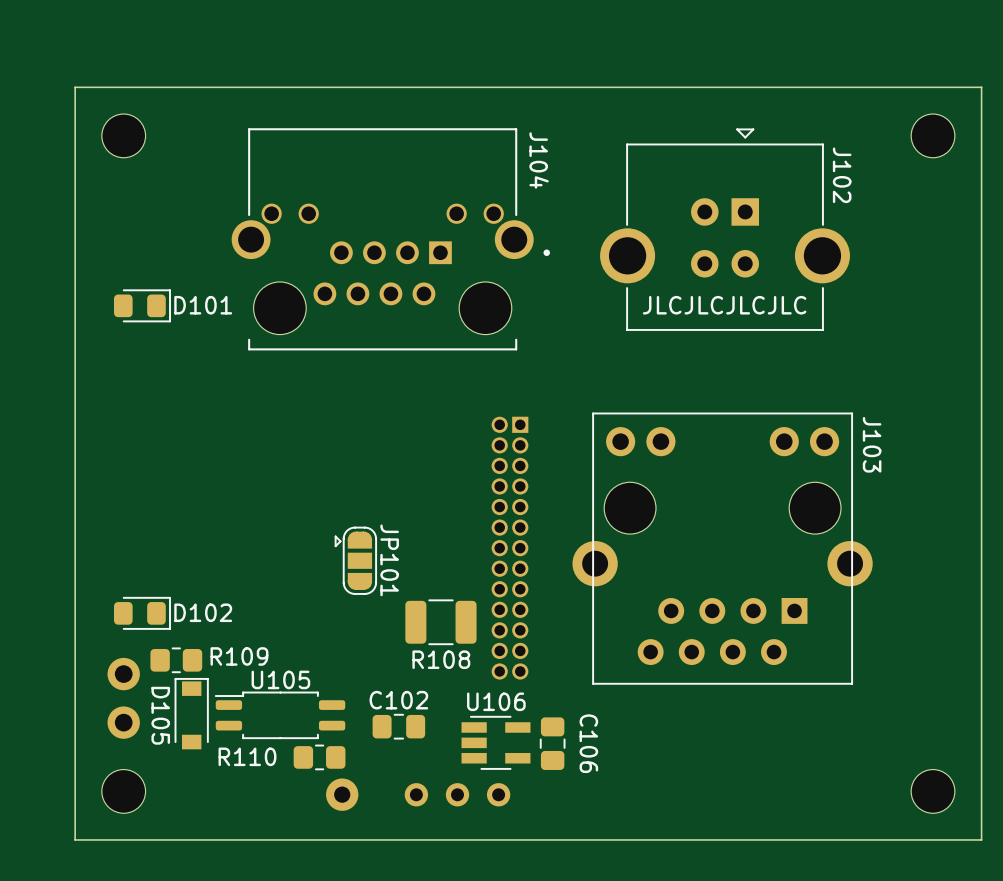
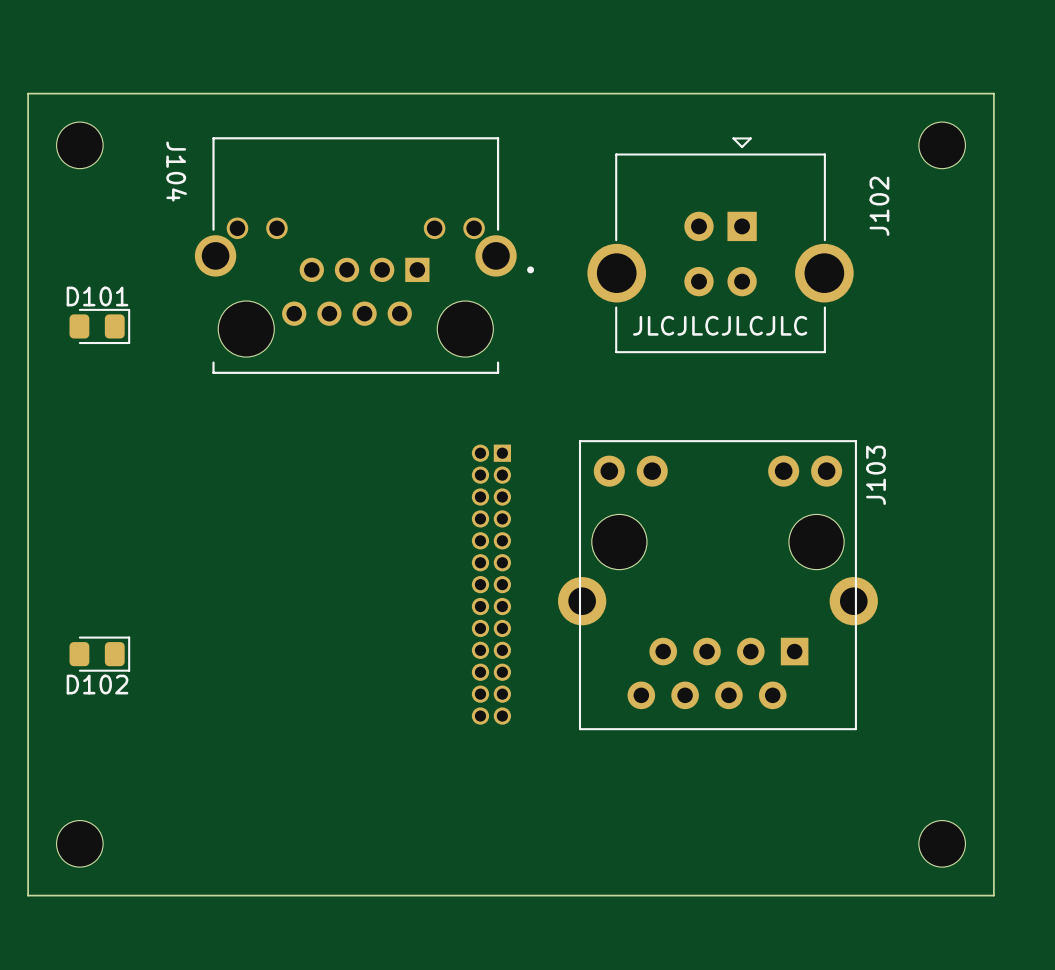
J104 name position: J104 (539, 160) -> J104 (176, 171)
J102 name rotation: 0° (842, 175) -> 180° (879, 206)
D101 name position: D101 (203, 305) -> D101 (97, 296)
J103 name rotation: 0° (872, 444) -> 180° (875, 475)
JP101: (355, 560) -> none
D102 name position: D102 (203, 612) -> D102 (97, 684)
R108: (440, 622) -> none
R109: (176, 660) -> none
part: (123, 674) -> none
D105: (191, 713) -> none
U105: (280, 715) -> none
part: (123, 722) -> none
C102: (398, 726) -> none
U106: (495, 742) -> none
C106: (552, 743) -> none
R110: (319, 757) -> none
part: (342, 794) -> none
part: (457, 794) -> none

